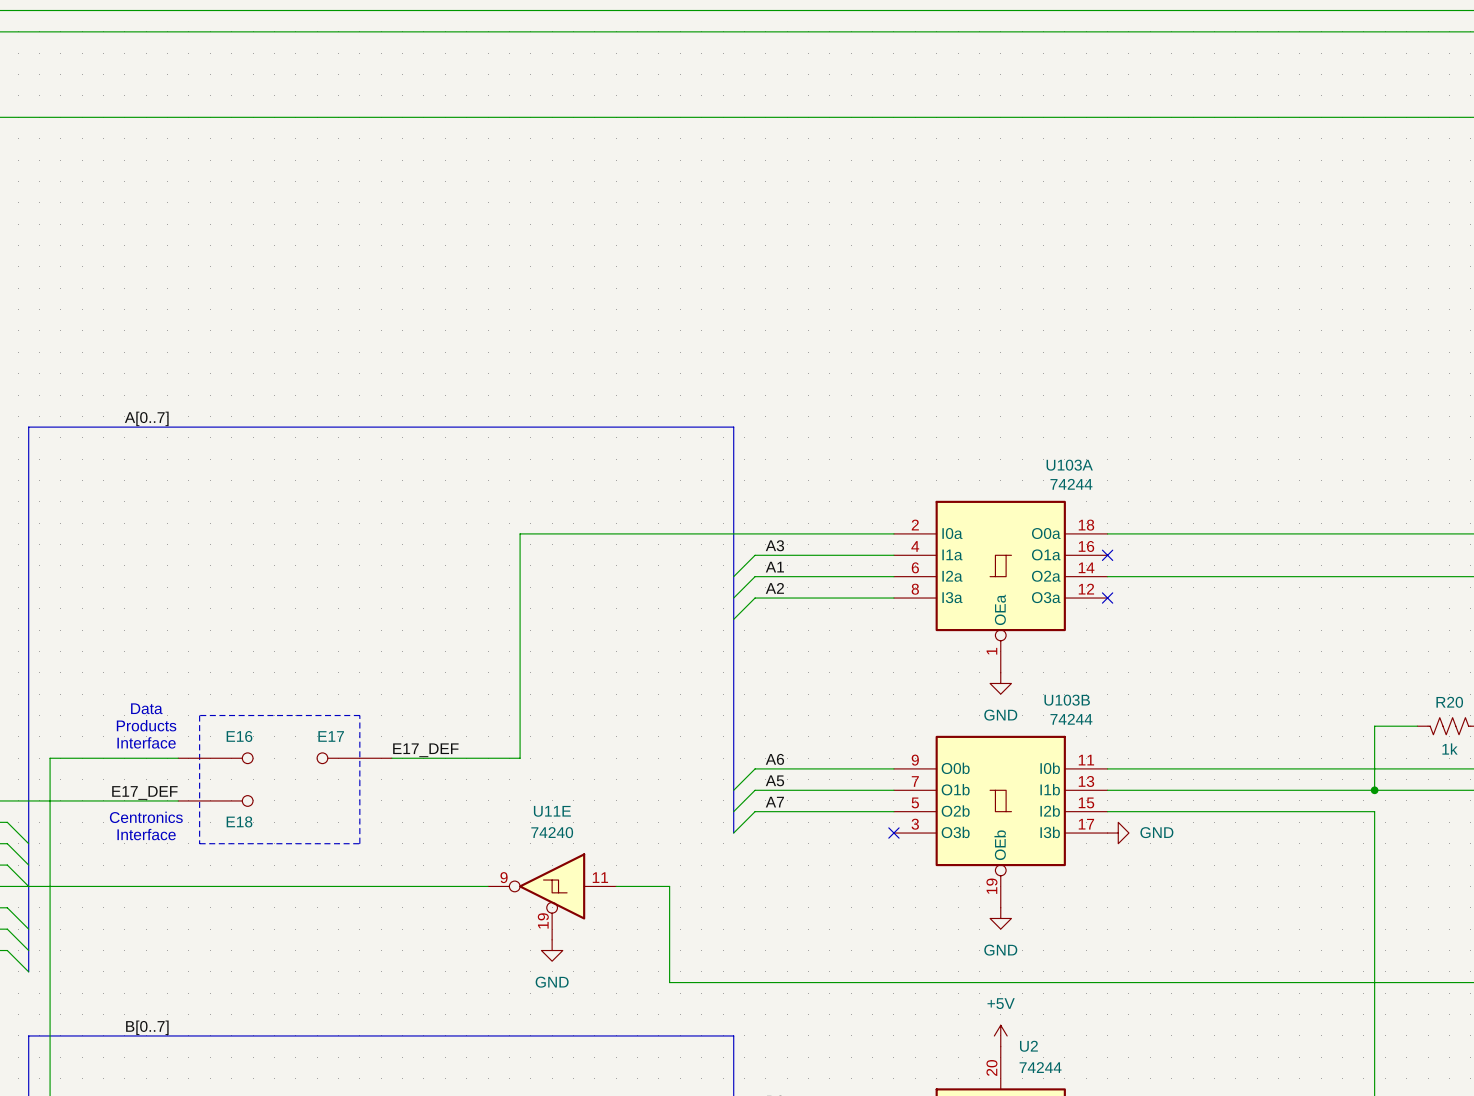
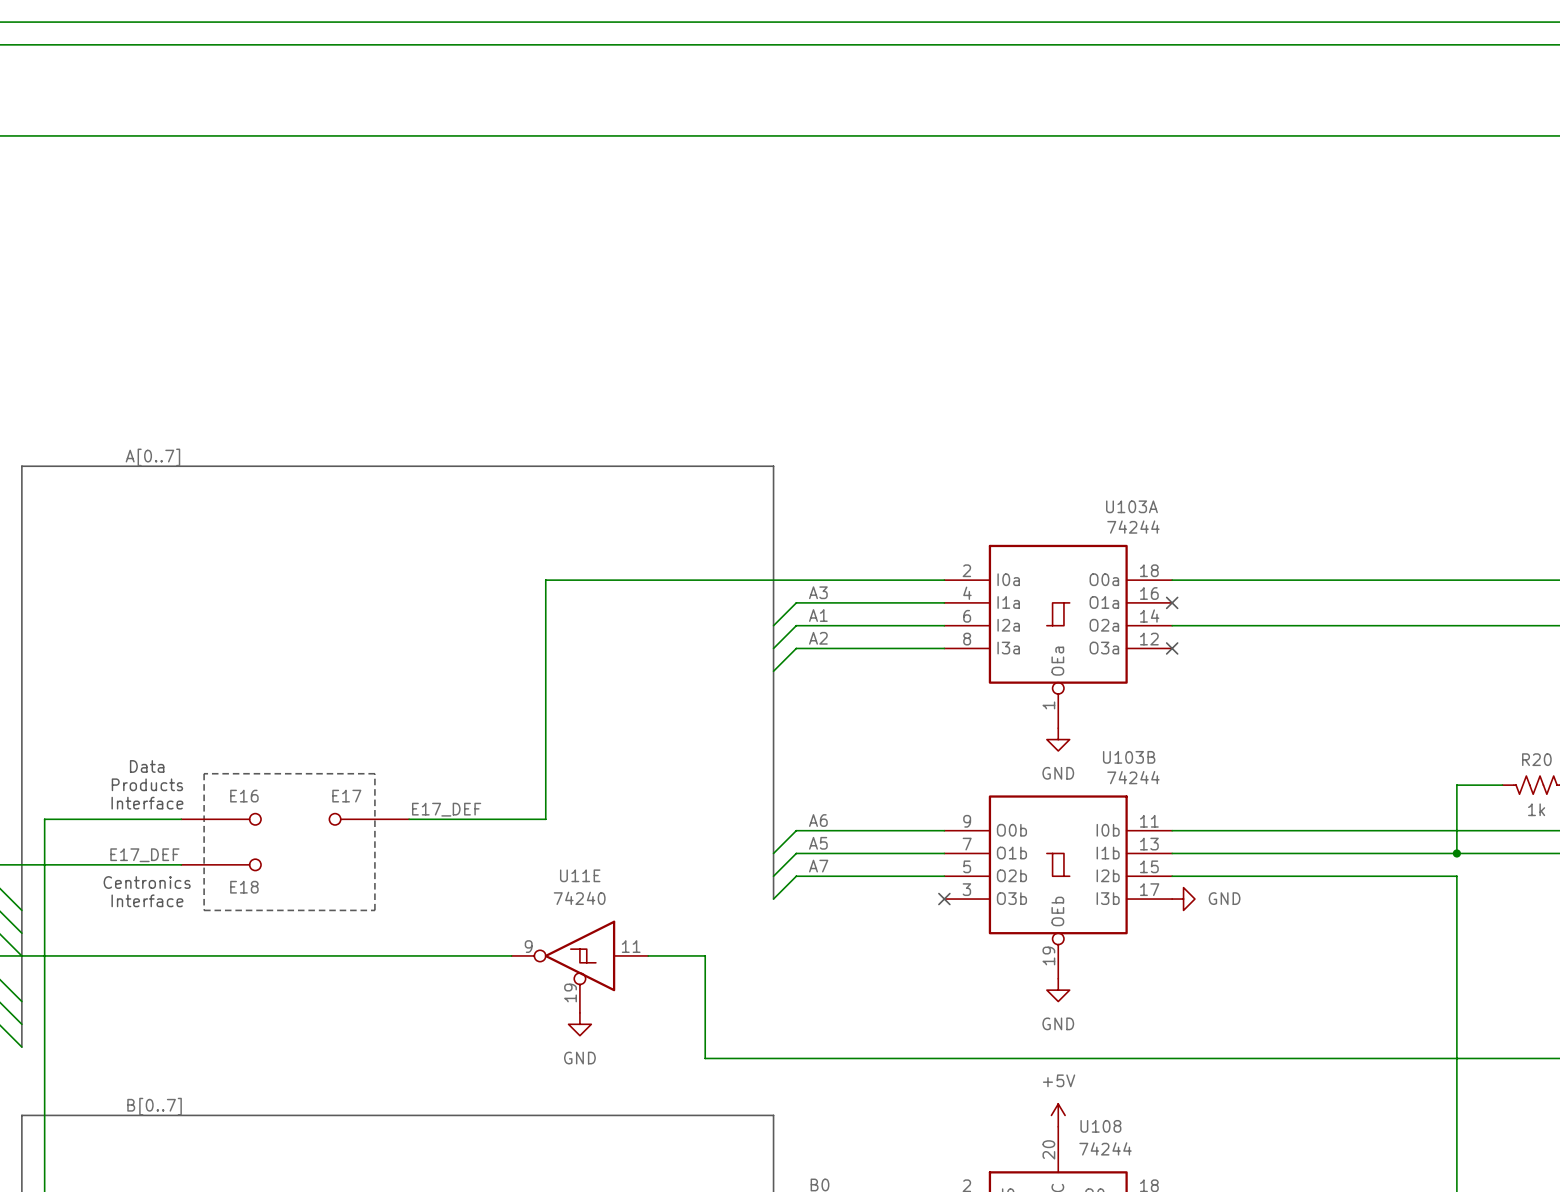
U2 name: U2 (1028, 1046) -> U108 (1100, 1126)

